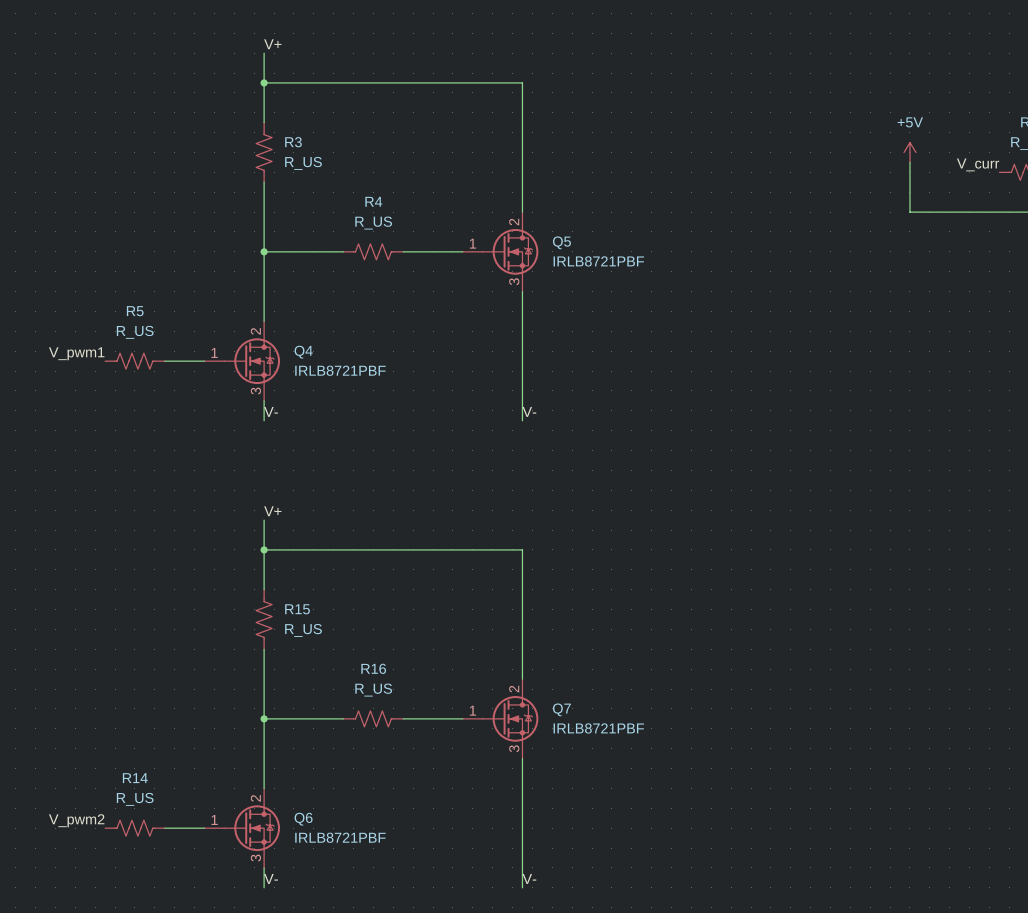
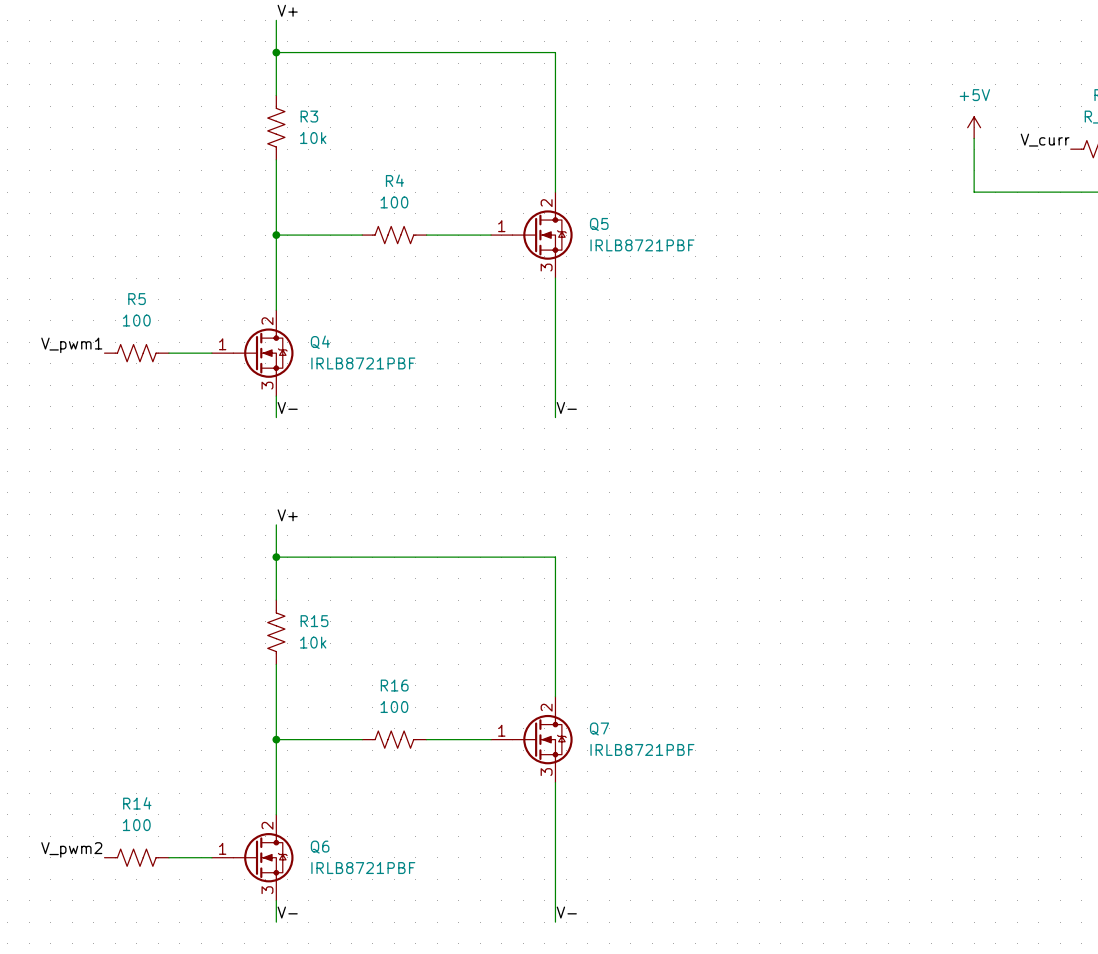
R3 value: R_US (303, 163) -> 10k (313, 138)
R4 value: R_US (373, 223) -> 100 (394, 202)
R5 value: R_US (135, 332) -> 100 (136, 320)
R15 value: R_US (303, 630) -> 10k (313, 642)
R16 value: R_US (373, 690) -> 100 (394, 707)
R14 value: R_US (135, 799) -> 100 (136, 825)

